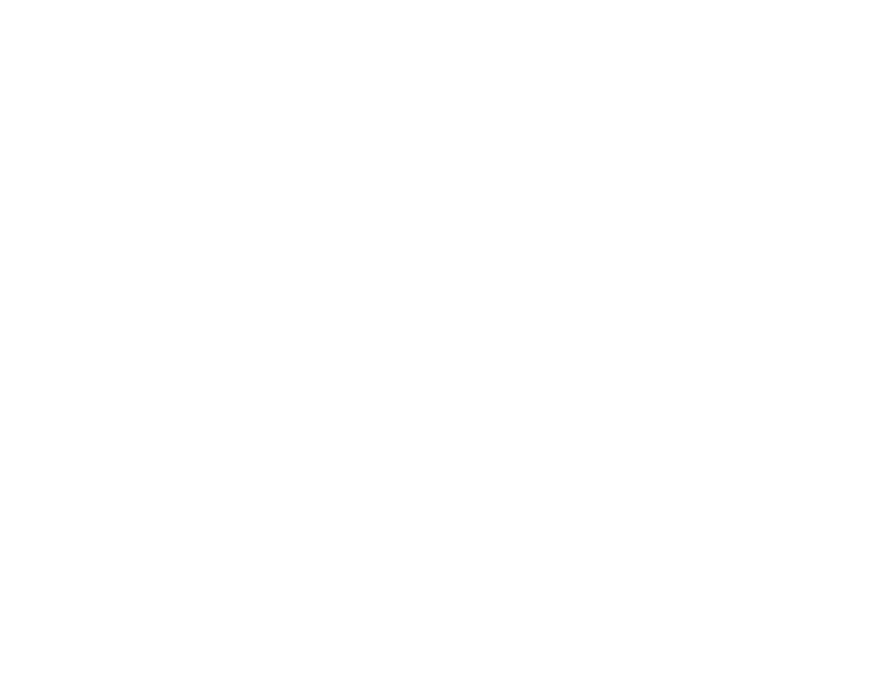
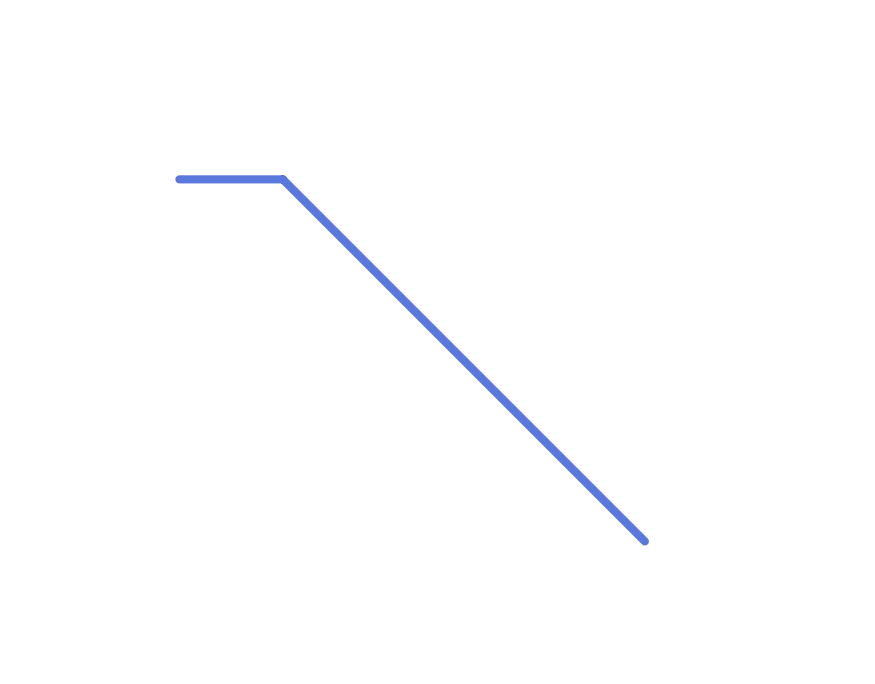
track: none -> (179, 179) (282, 179) (644, 541)

